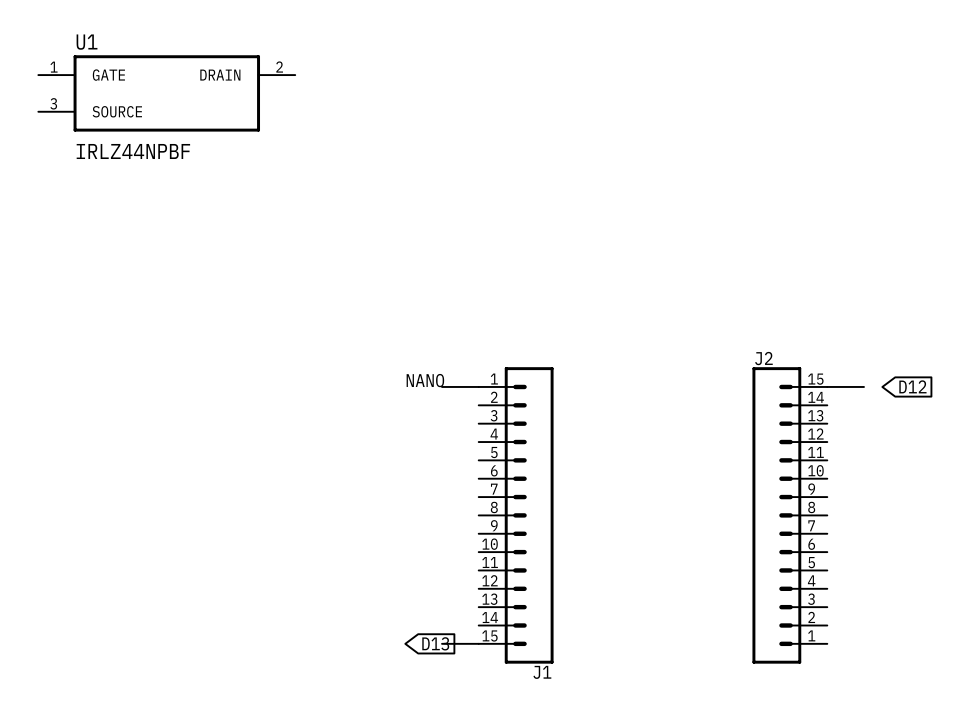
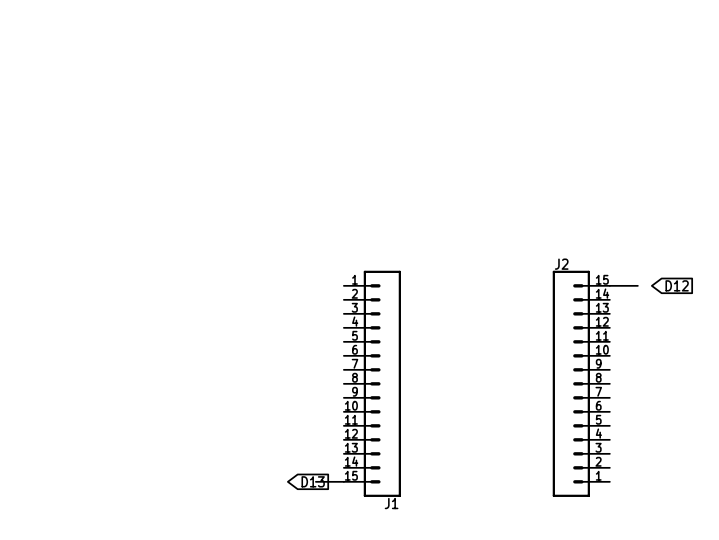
U1: IRLZ44NPBF (166, 93) -> none
label: NANO (425, 380) -> none
wire: (442, 386) (478, 386) -> none

